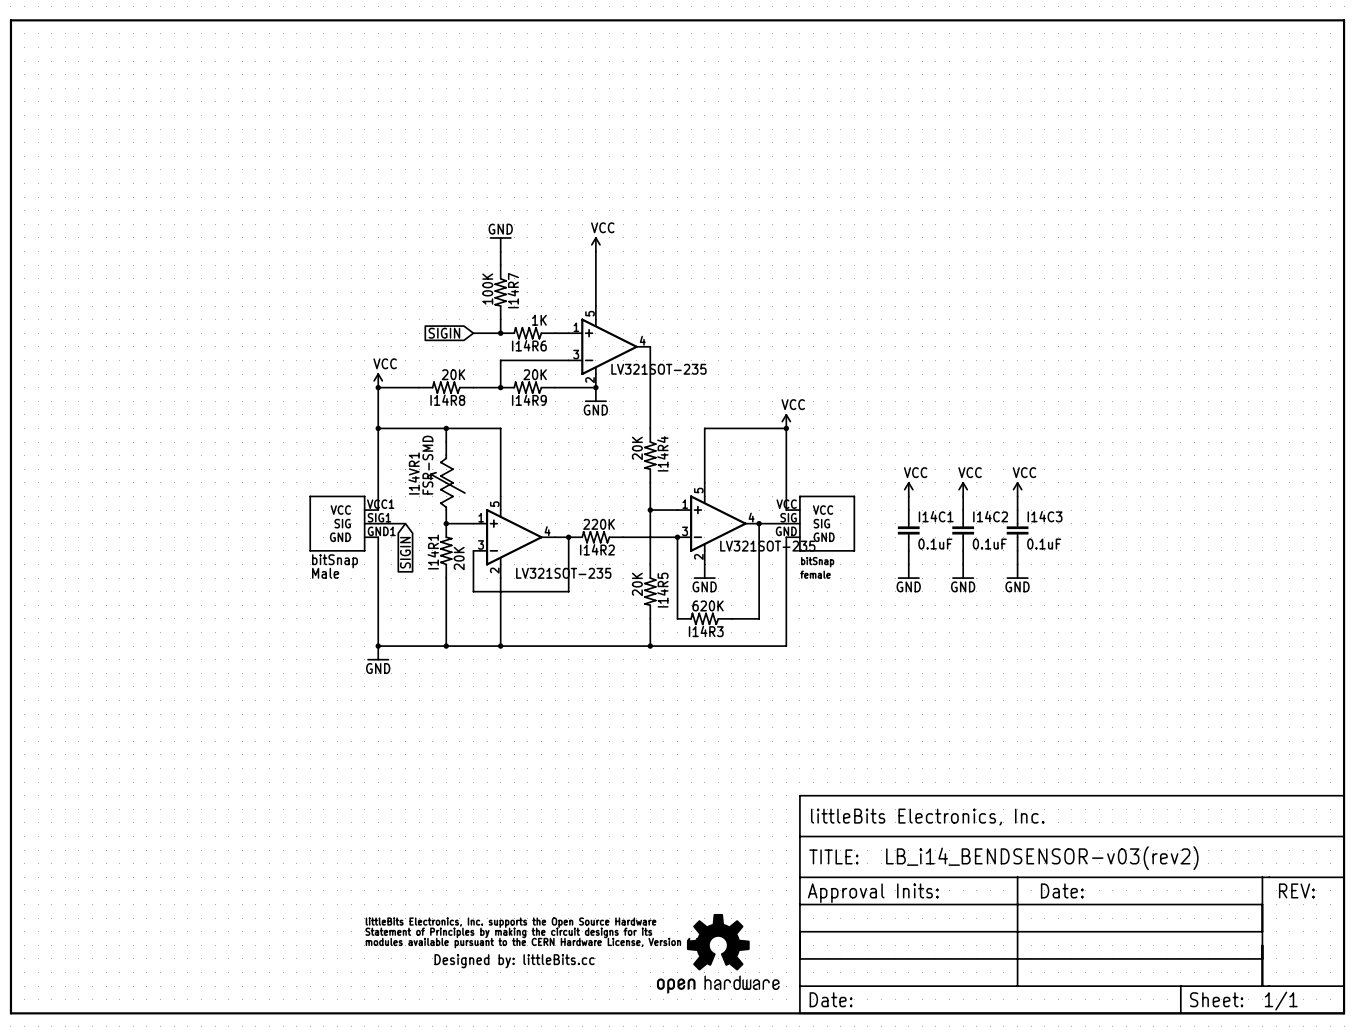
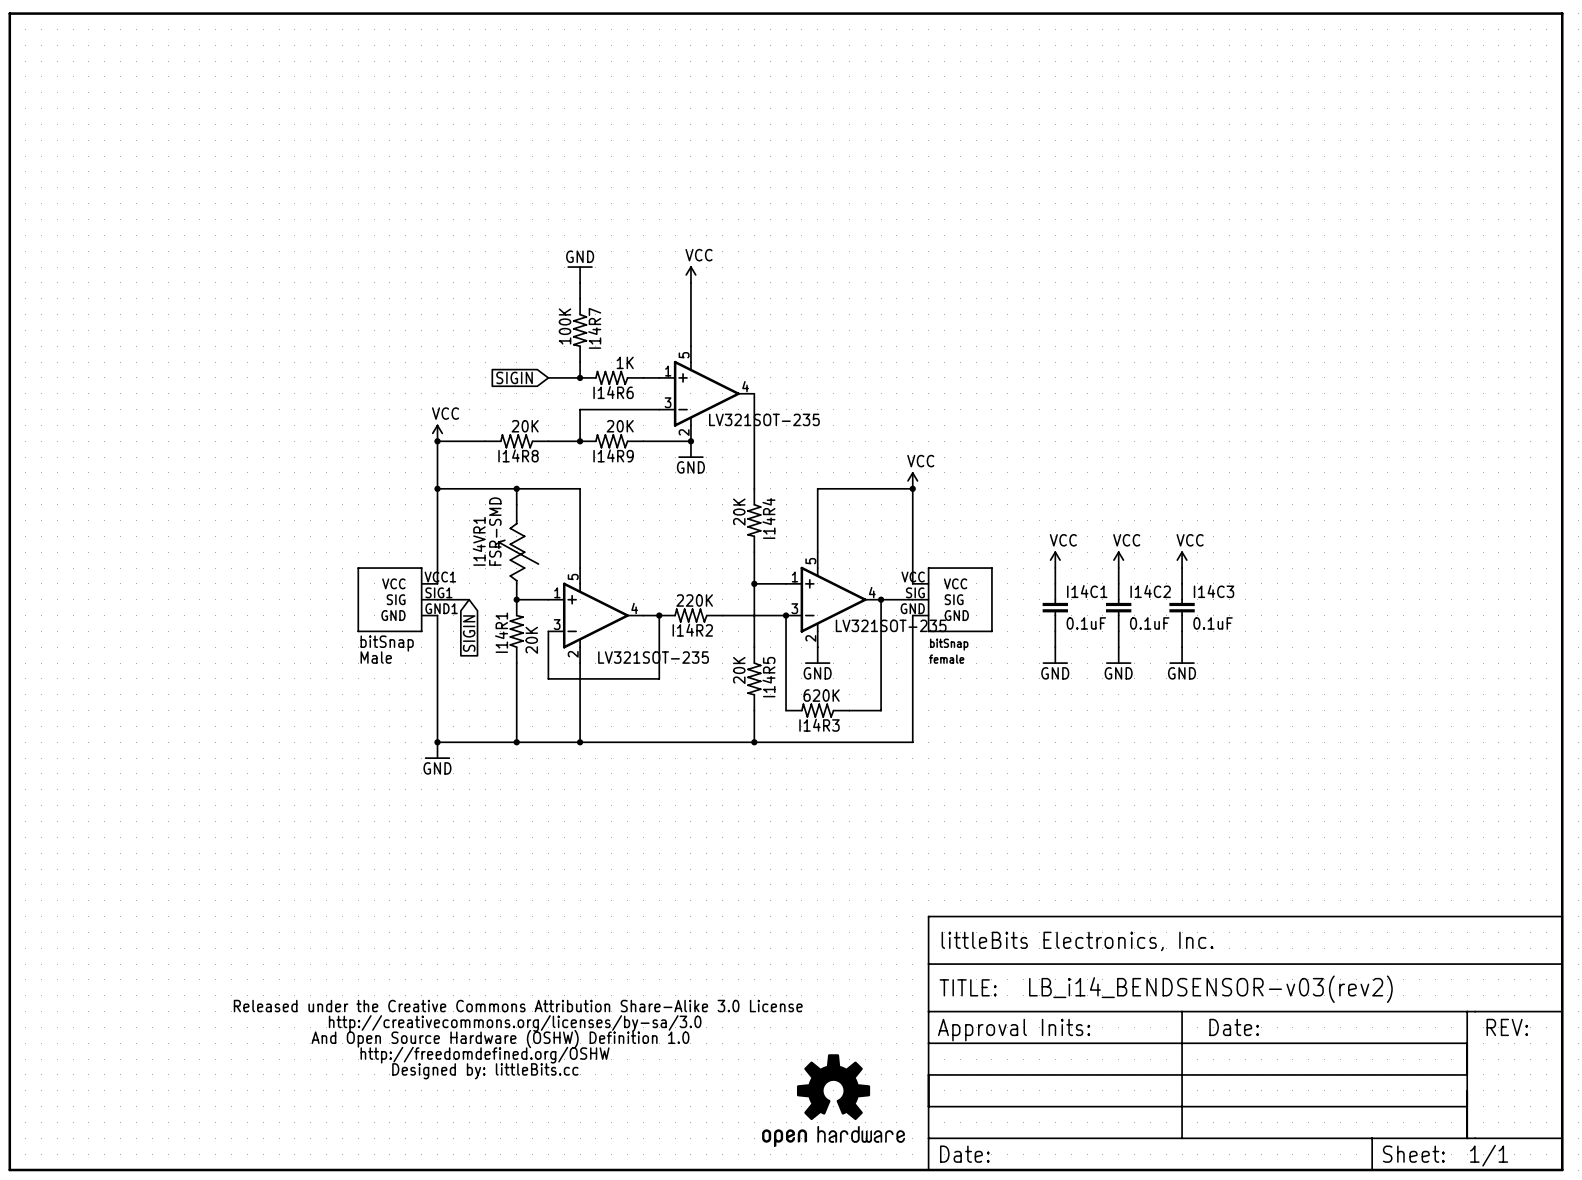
part: none -> (518, 1039)
part: (533, 942) -> none

